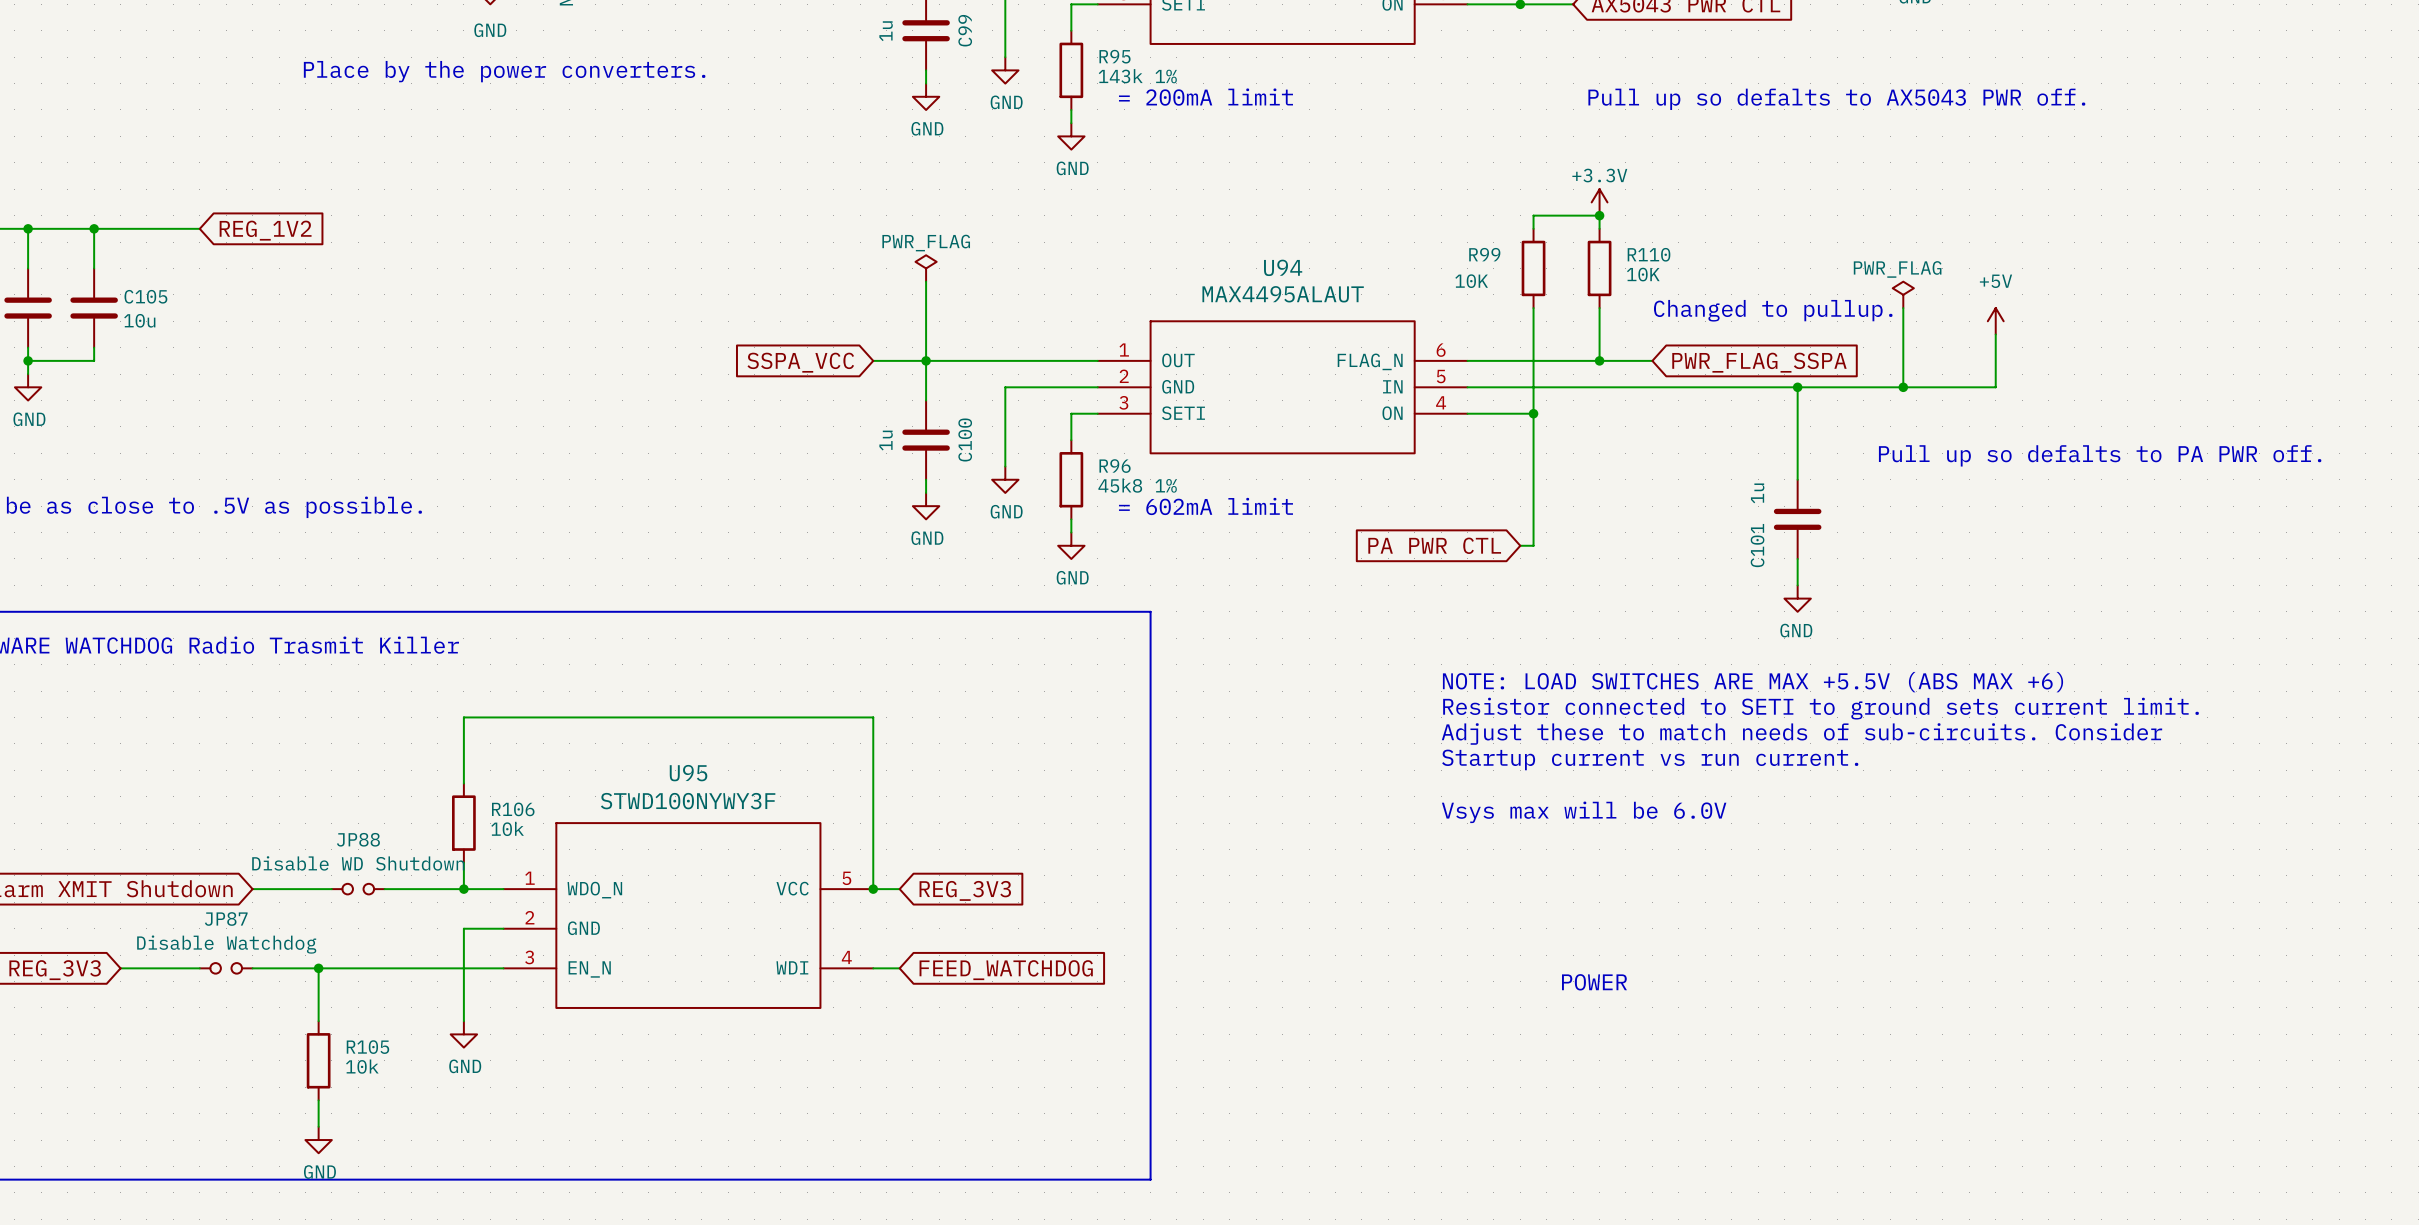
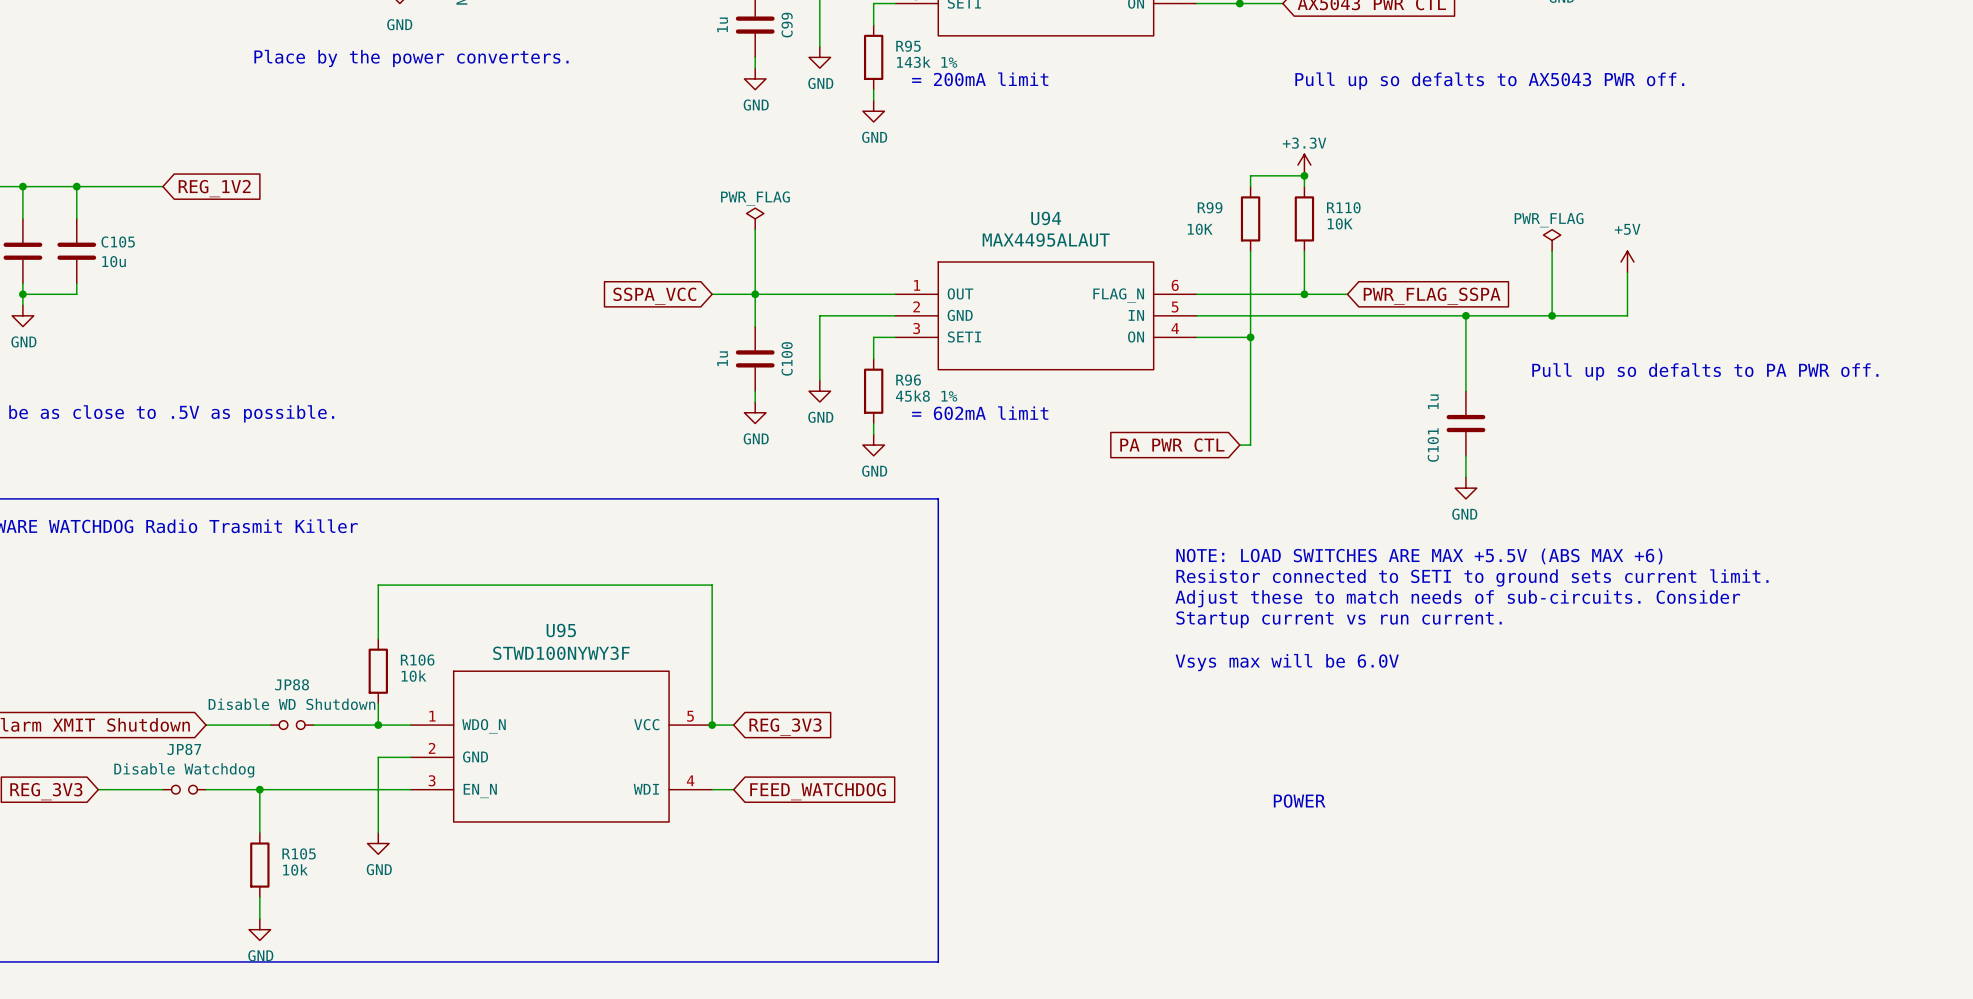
text: Changed to pullup. (1773, 310) -> none

